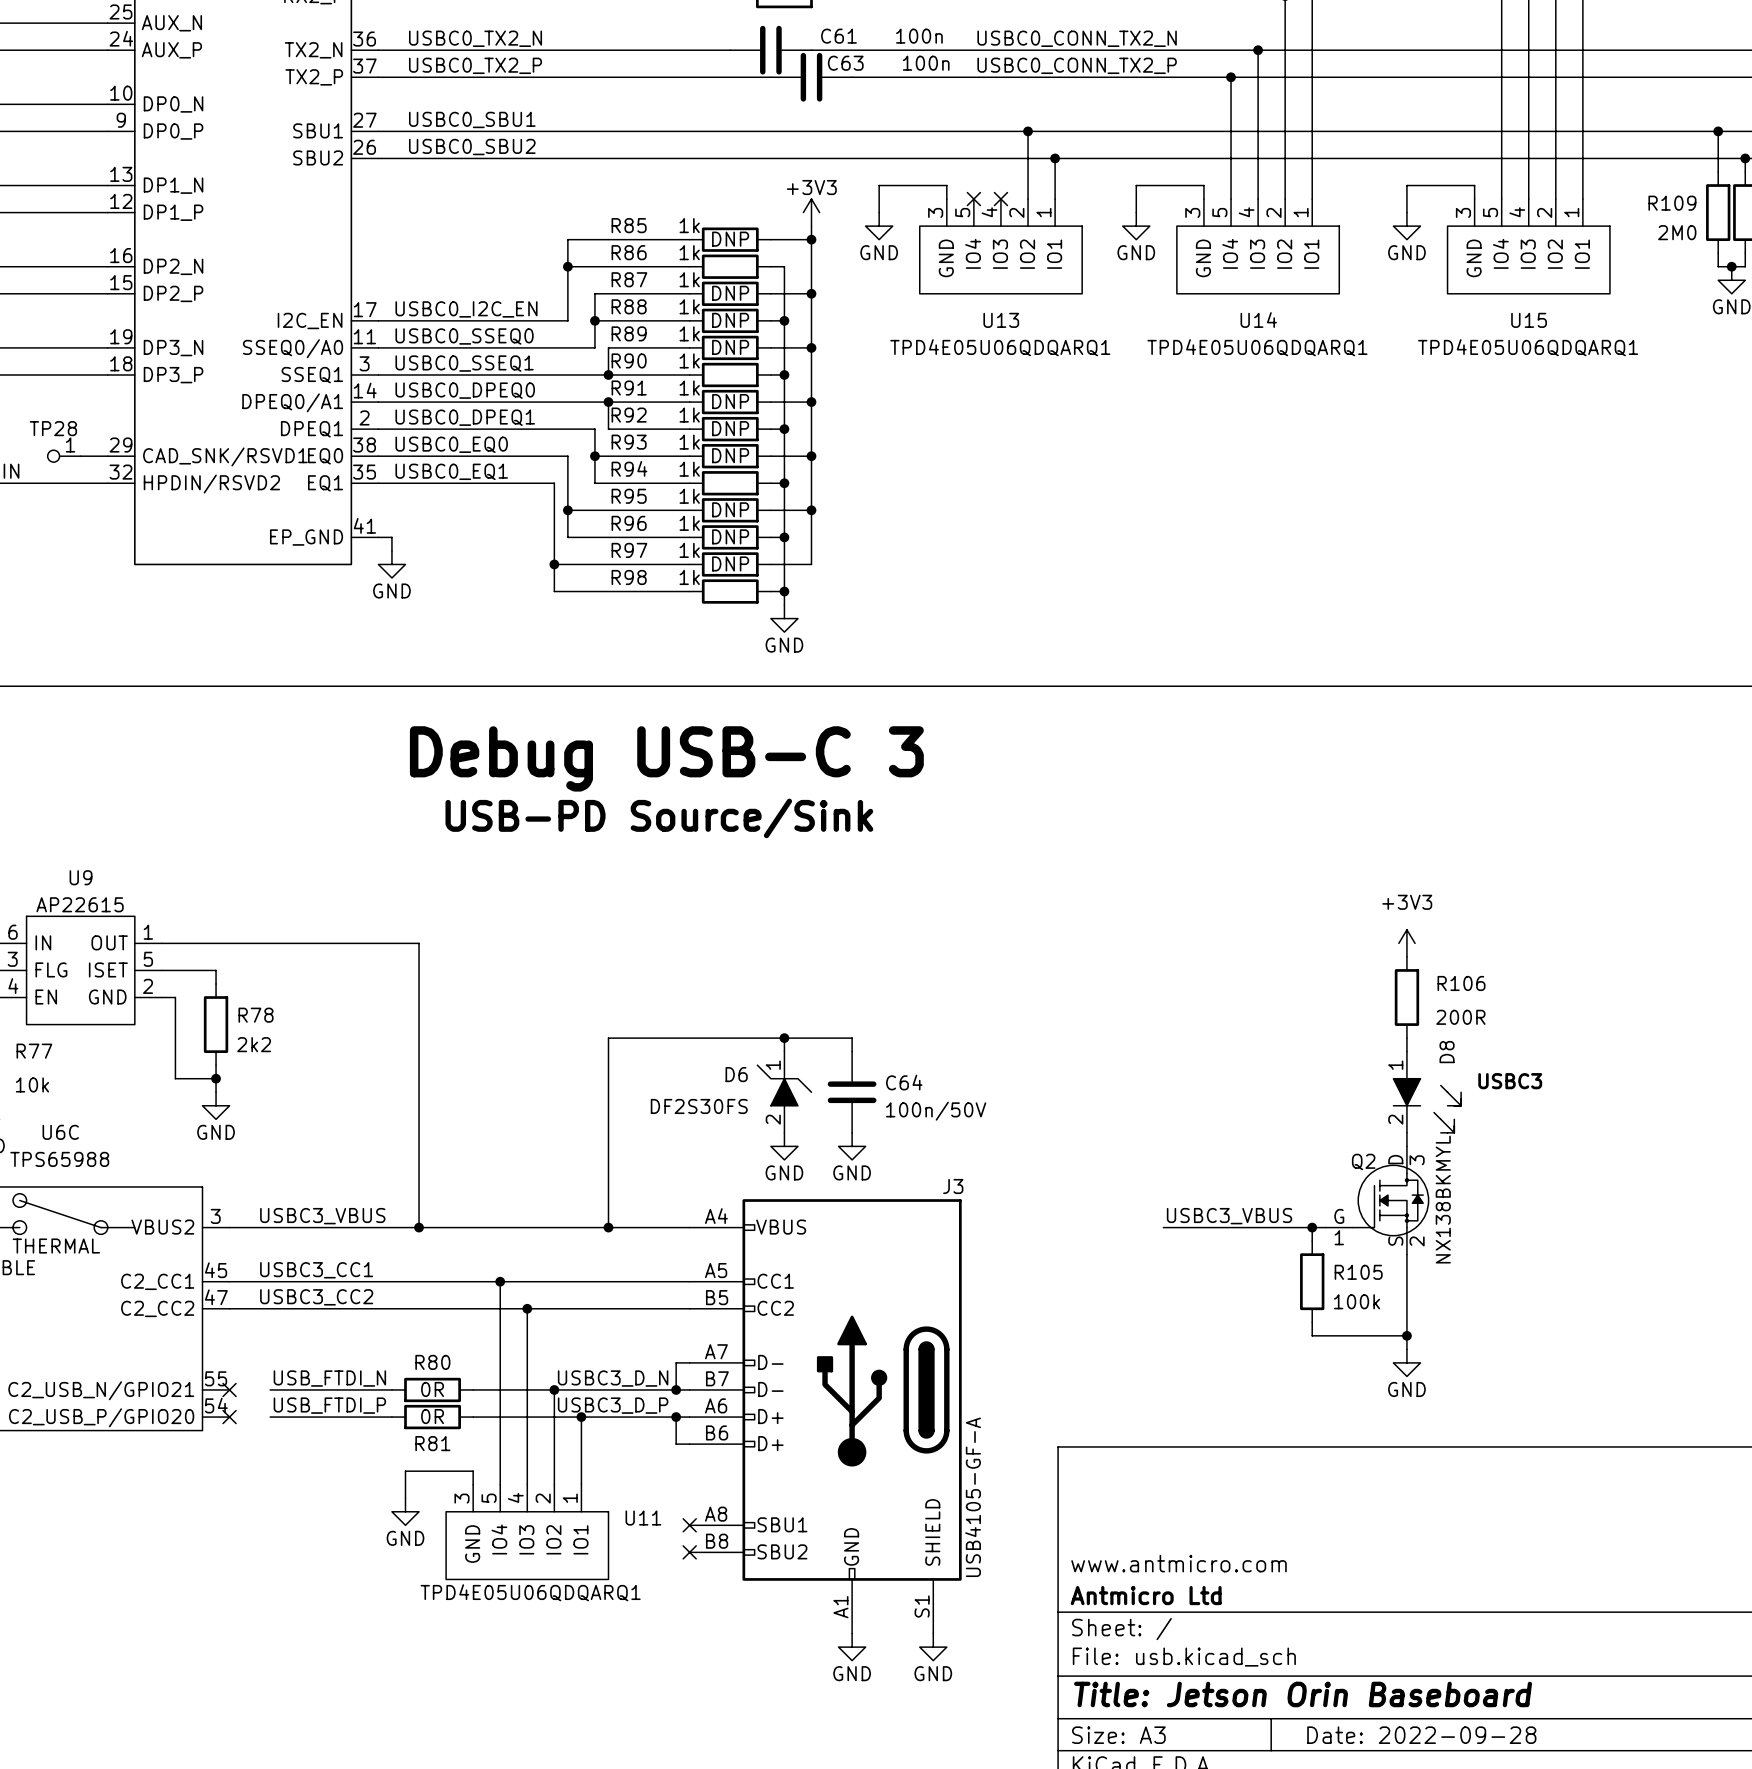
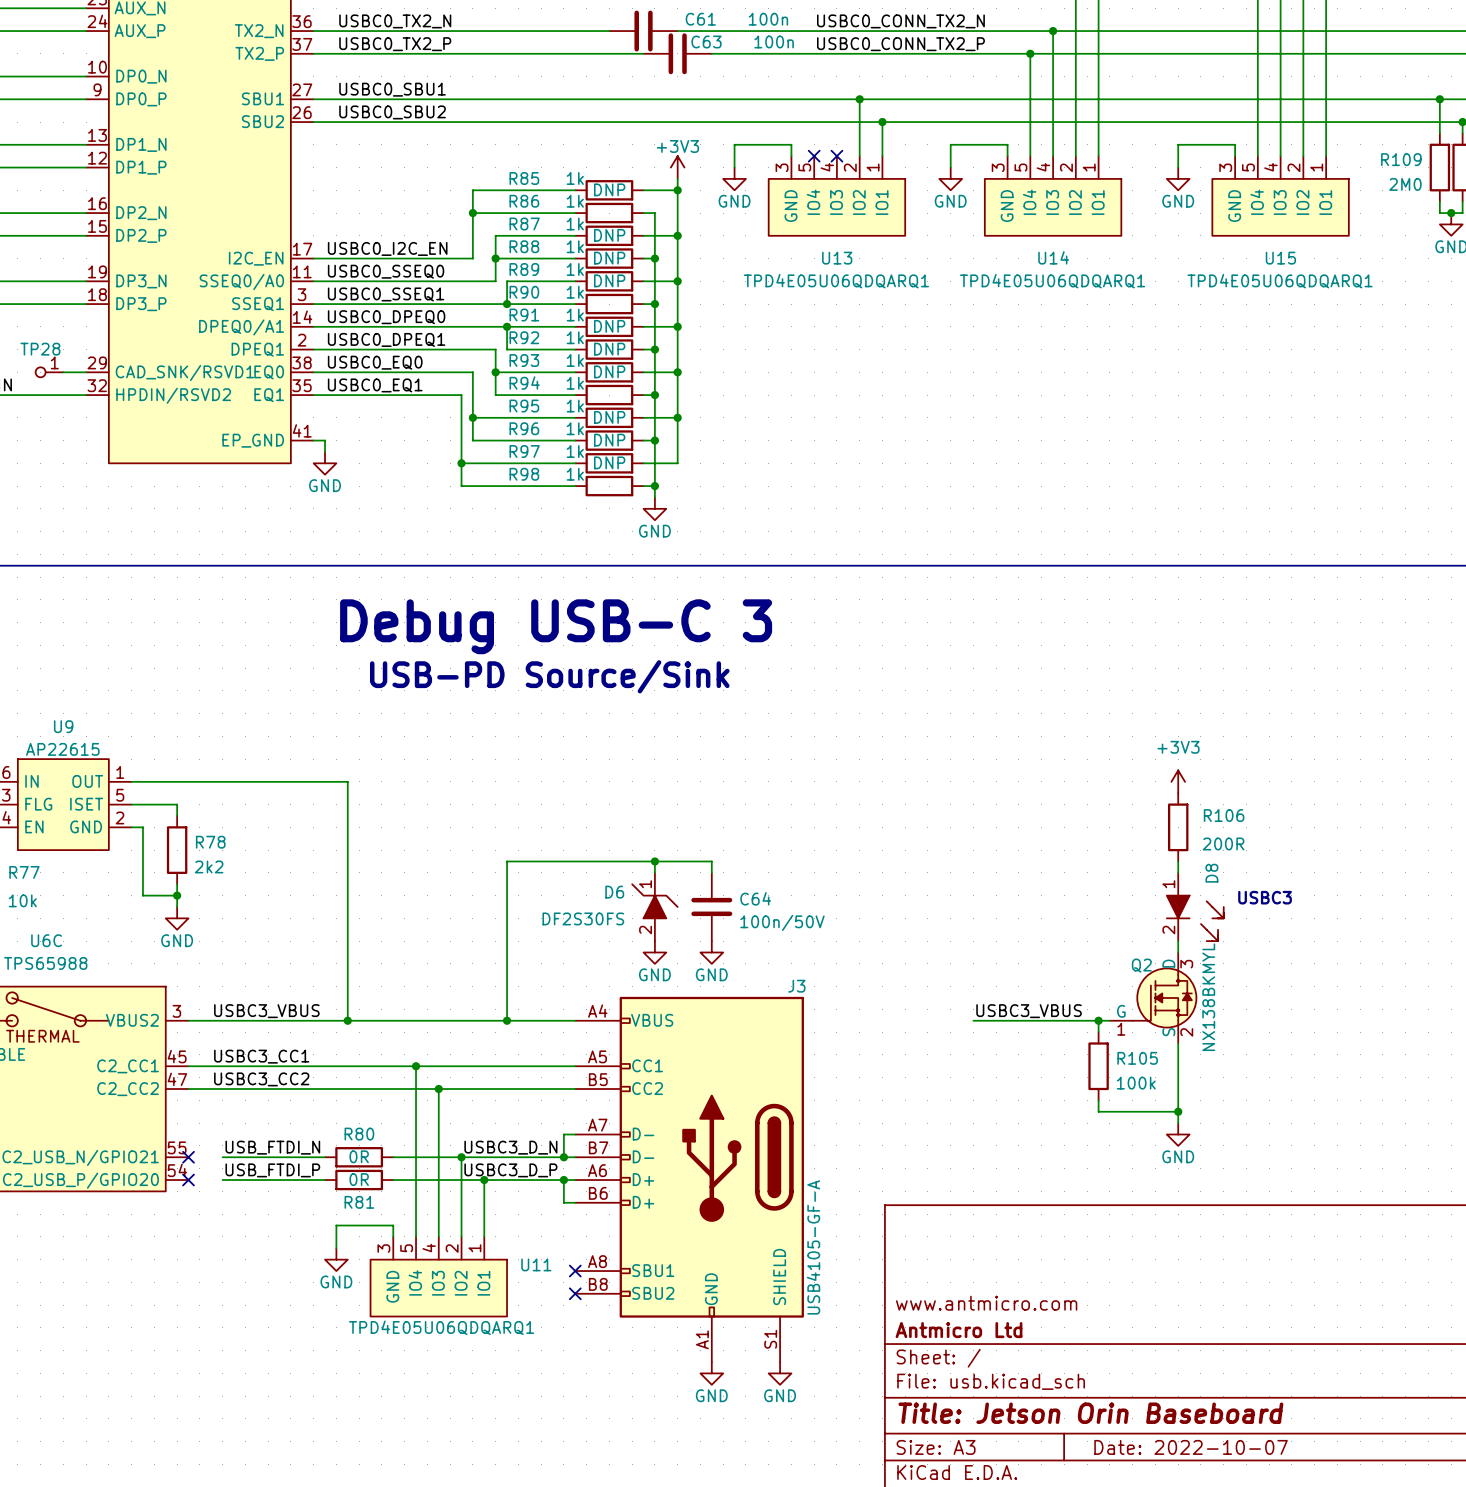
title block: Date: 2022-09-28 (1421, 1735) -> Date: 2022-10-07 (1191, 1447)

